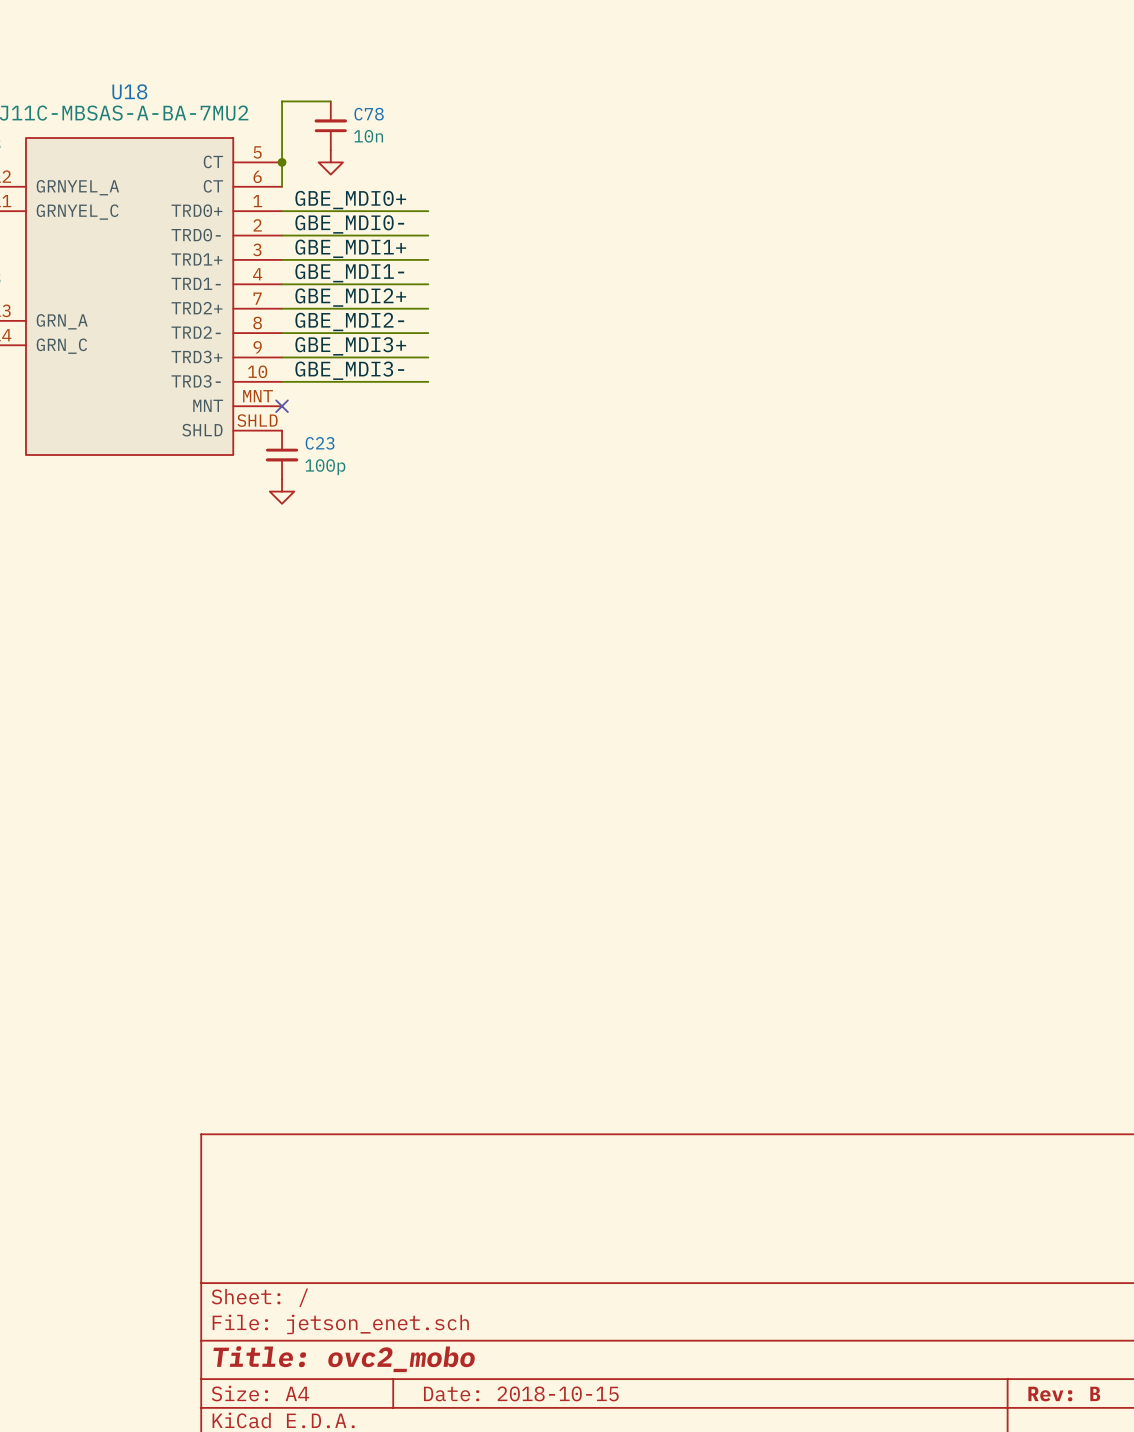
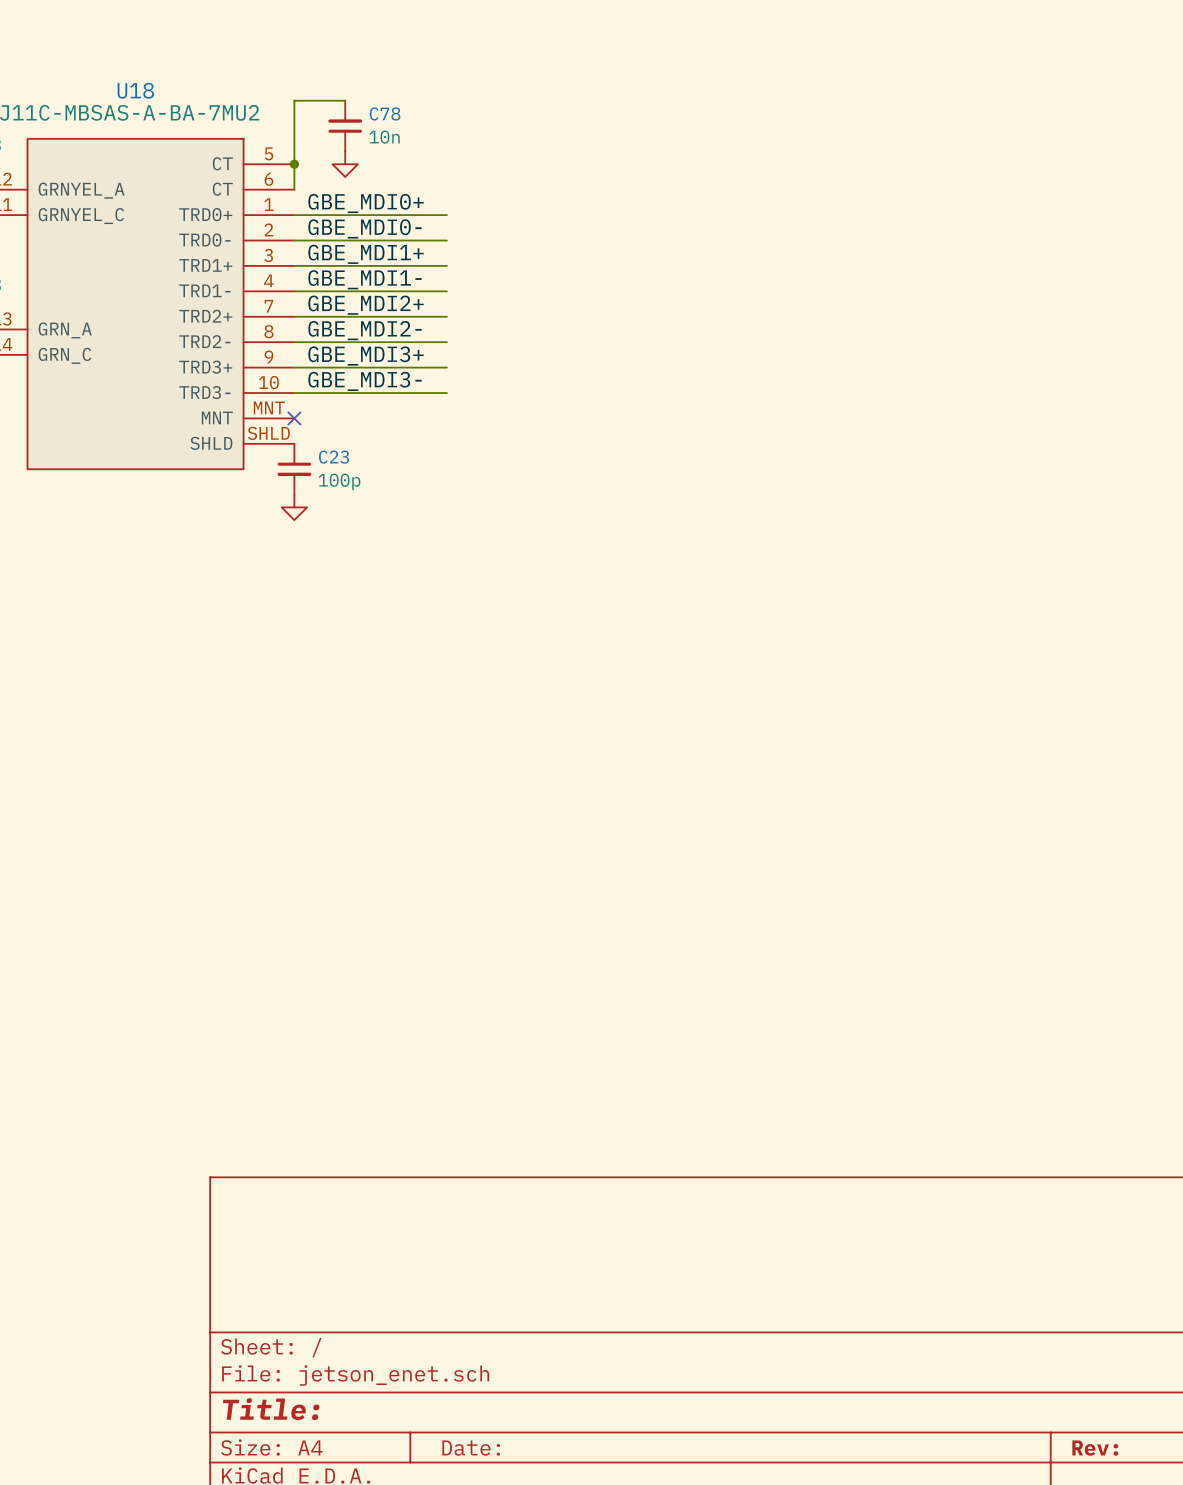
title block: Title: ovc2_mobo (344, 1359) -> Title: (271, 1409)
title block: Date: 2018-10-15 (521, 1393) -> Date: (471, 1448)
title block: Rev: B (1064, 1394) -> Rev: (1095, 1448)

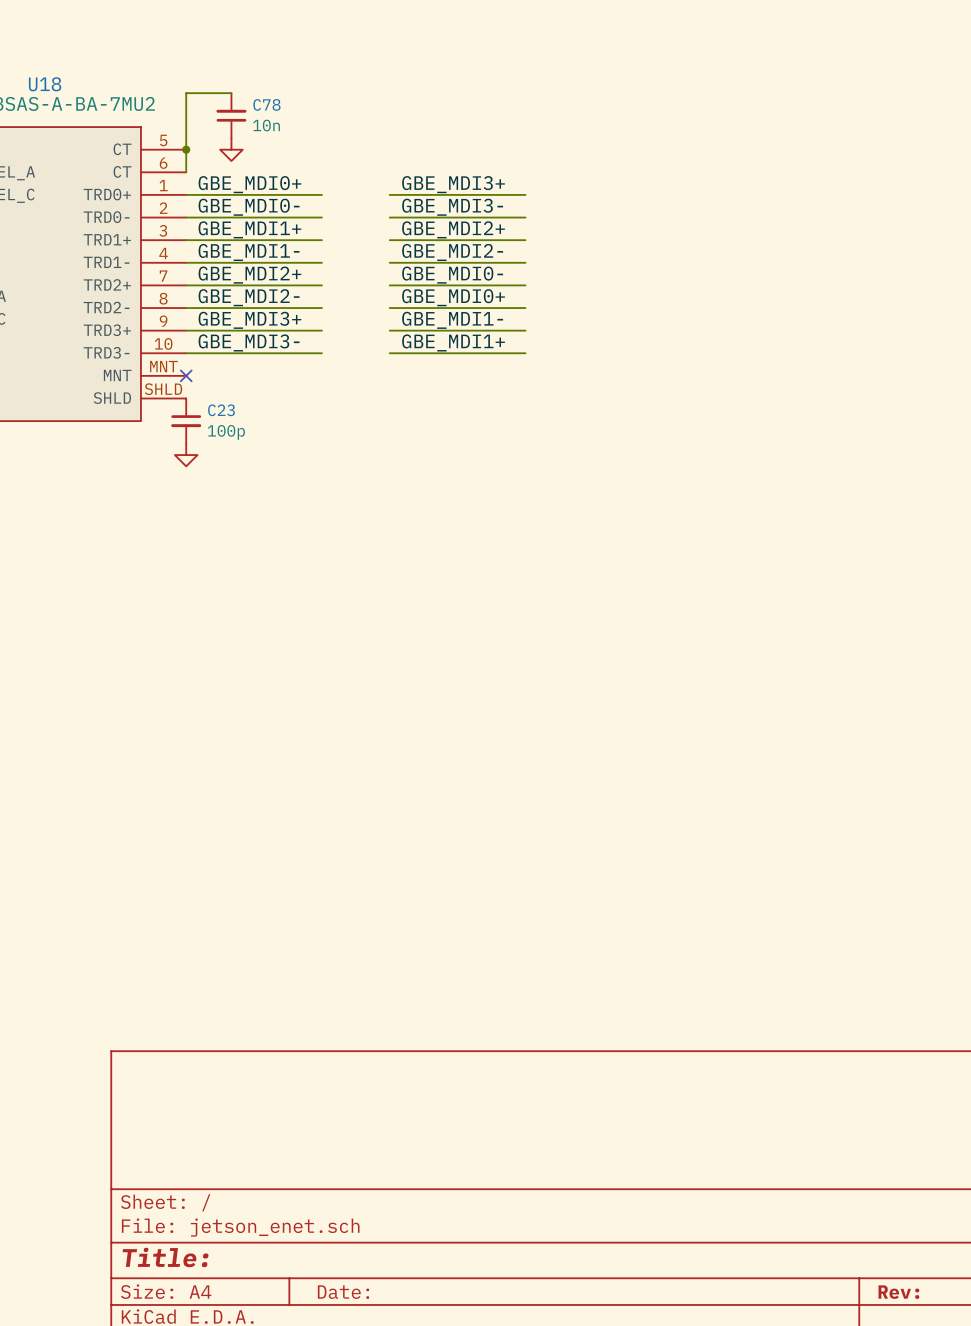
label: none -> GBE_MDI3+ (453, 184)
wire: none -> (389, 194) (525, 194)
label: none -> GBE_MDI3- (452, 207)
wire: none -> (389, 217) (525, 217)
label: none -> GBE_MDI2+ (453, 229)
wire: none -> (389, 240) (525, 240)
label: none -> GBE_MDI2- (452, 252)
wire: none -> (389, 262) (525, 262)
label: none -> GBE_MDI0- (452, 275)
wire: none -> (389, 285) (525, 285)
label: none -> GBE_MDI0+ (453, 297)
wire: none -> (389, 308) (525, 308)
label: none -> GBE_MDI1- (452, 320)
wire: none -> (389, 330) (525, 330)
label: none -> GBE_MDI1+ (453, 342)
wire: none -> (389, 353) (525, 353)

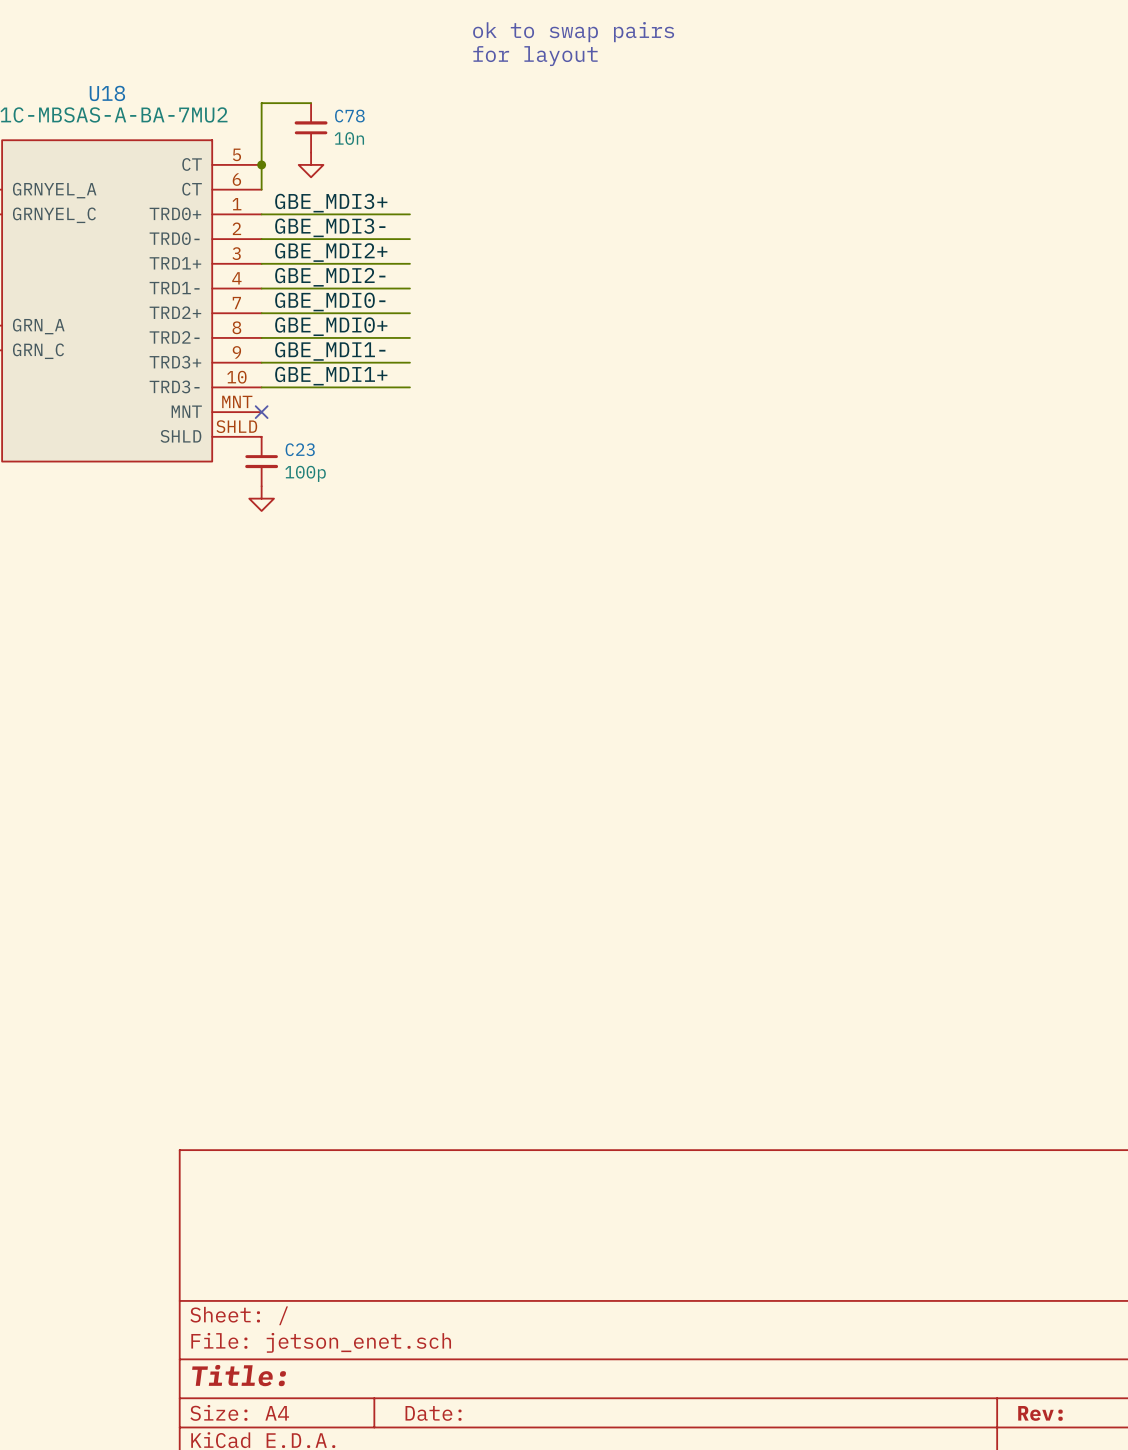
text: none -> ok to swap pairs (573, 32)
text: none -> for layout (535, 56)
label: GBE_MDI0+ (249, 184) -> GBE_MDI3+ (331, 203)
label: GBE_MDI3+ (453, 184) -> none
wire: (389, 194) (525, 194) -> none
label: GBE_MDI0- (249, 207) -> GBE_MDI3- (330, 227)
label: GBE_MDI3- (452, 207) -> none
wire: (389, 217) (525, 217) -> none
label: GBE_MDI1+ (249, 229) -> GBE_MDI2+ (331, 252)
label: GBE_MDI2+ (453, 229) -> none
wire: (389, 240) (525, 240) -> none
label: GBE_MDI1- (249, 252) -> GBE_MDI2- (330, 277)
label: GBE_MDI2- (452, 252) -> none
wire: (389, 262) (525, 262) -> none
label: GBE_MDI2+ (249, 275) -> GBE_MDI0- (330, 301)
label: GBE_MDI0- (452, 275) -> none
wire: (389, 285) (525, 285) -> none
label: GBE_MDI2- (249, 297) -> GBE_MDI0+ (331, 326)
label: GBE_MDI0+ (453, 297) -> none
wire: (389, 308) (525, 308) -> none
label: GBE_MDI3+ (249, 320) -> GBE_MDI1- (330, 351)
label: GBE_MDI1- (452, 320) -> none
wire: (389, 330) (525, 330) -> none
label: GBE_MDI3- (249, 342) -> GBE_MDI1+ (331, 376)
label: GBE_MDI1+ (453, 342) -> none
wire: (389, 353) (525, 353) -> none

